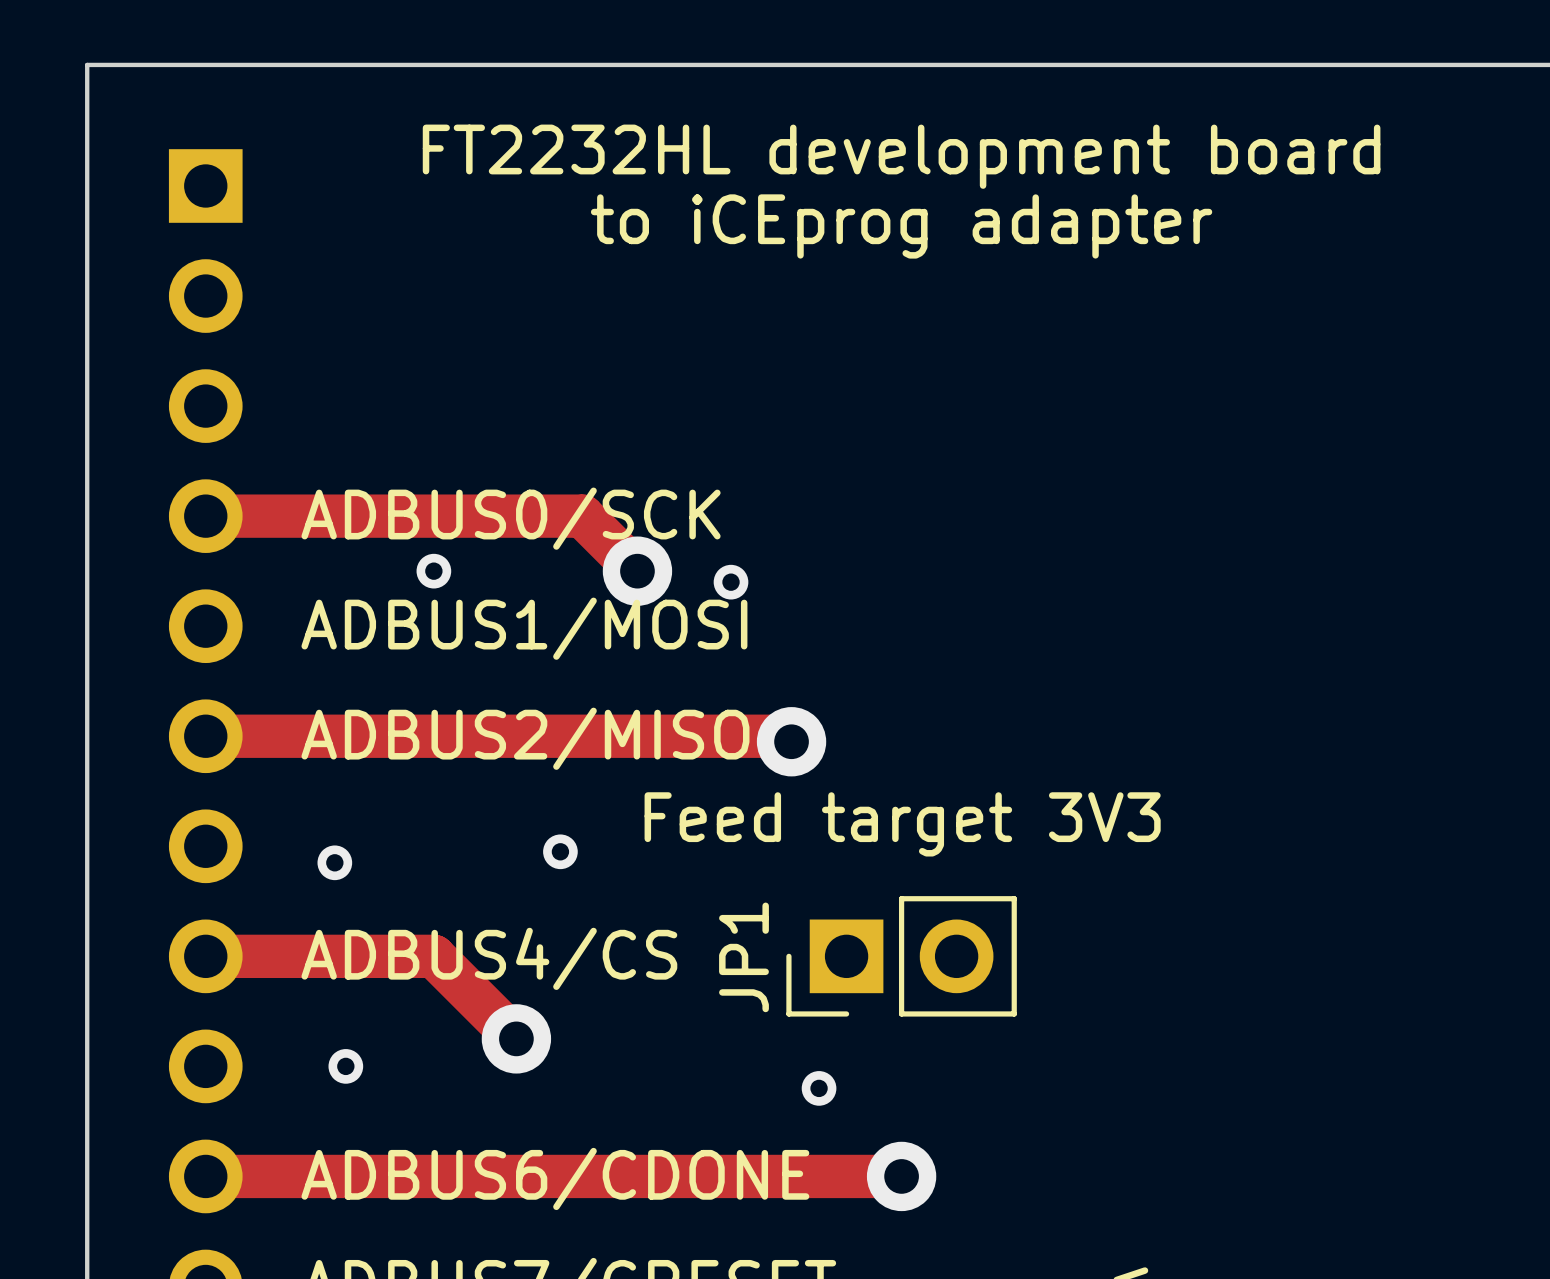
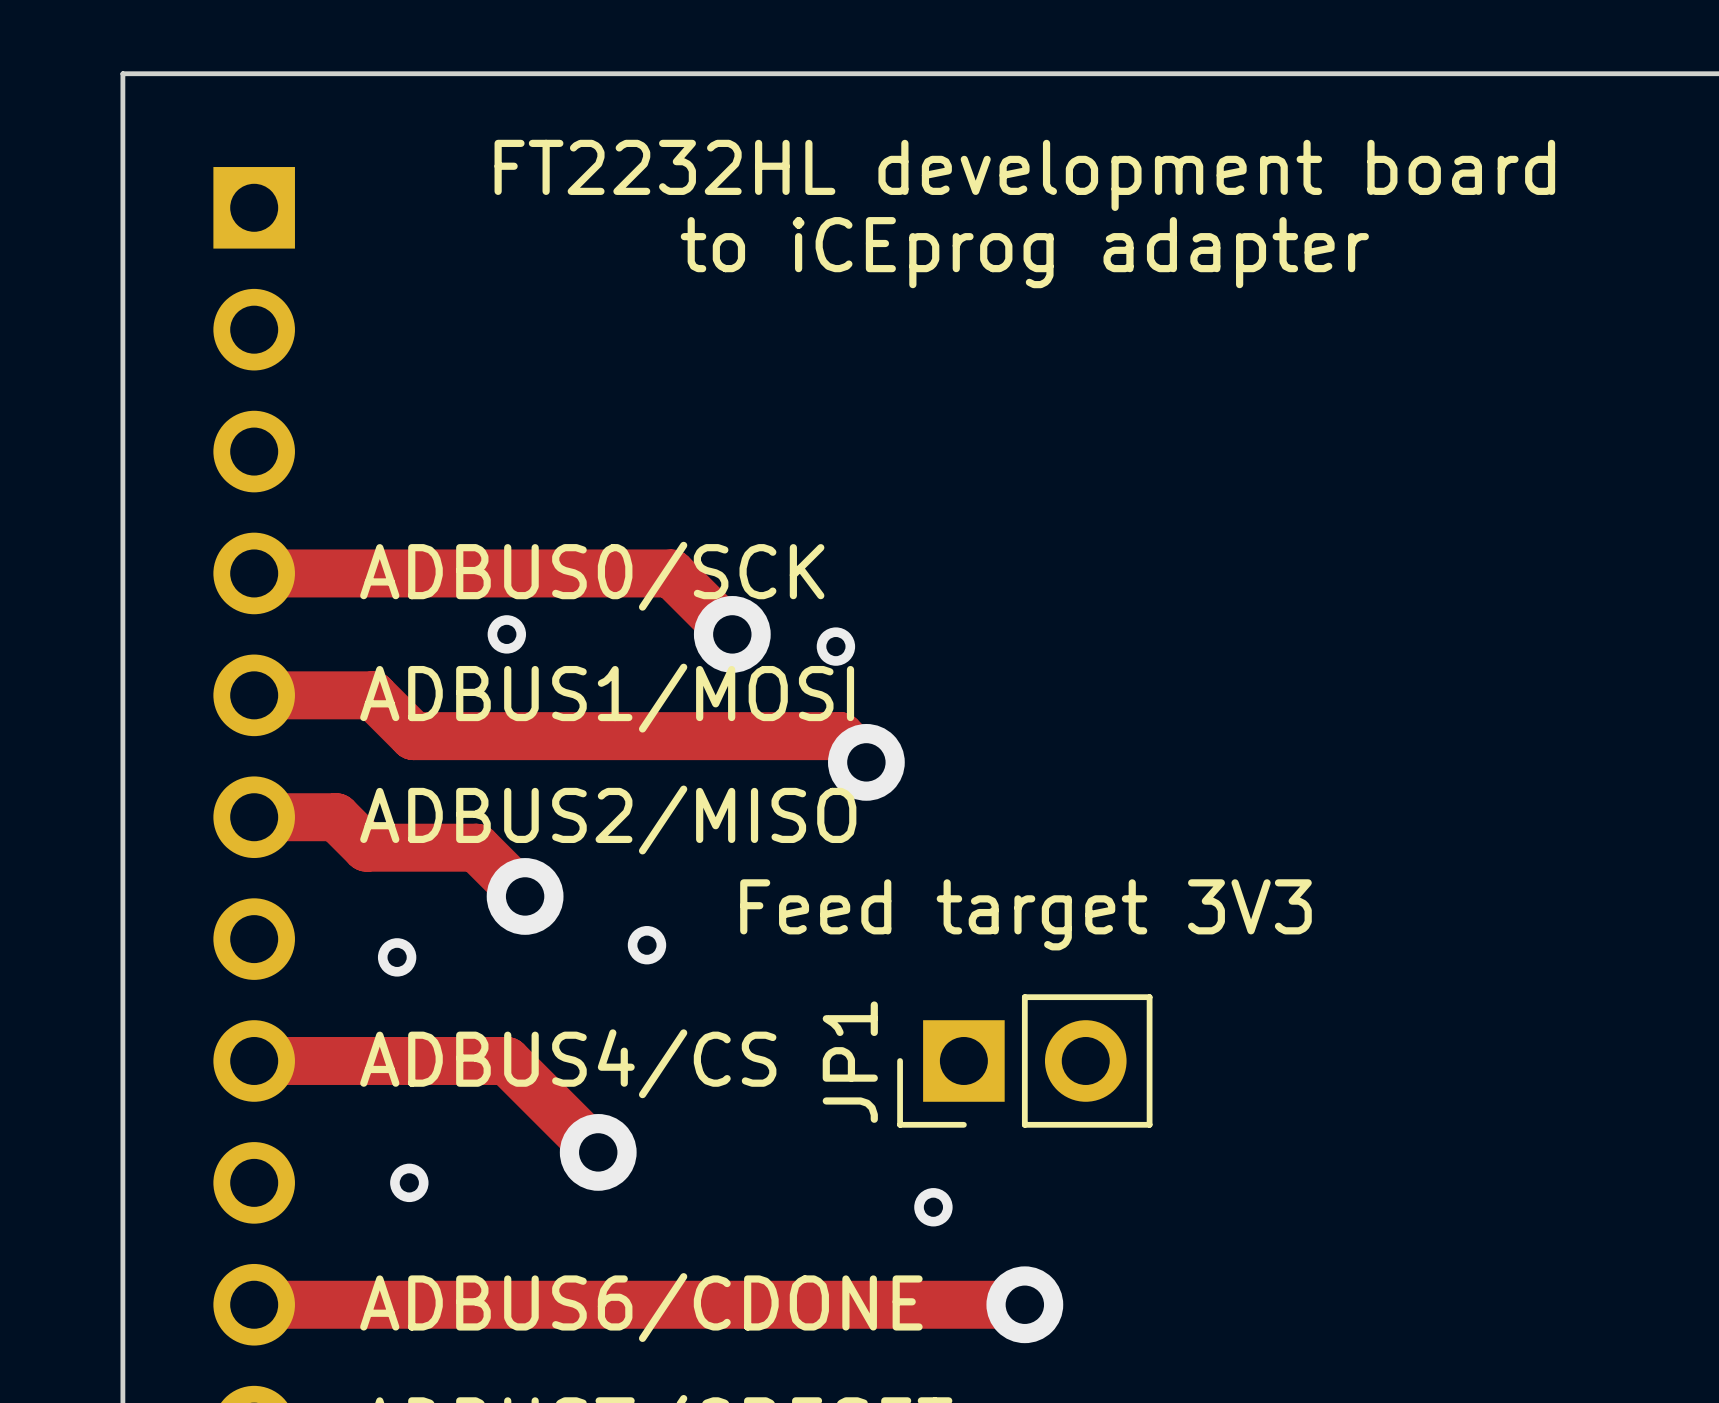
track: none -> (254, 695) (372, 695) (413, 736) (840, 736) (866, 762)
track: (279, 736) (786, 736) (791, 741) -> (336, 817) (366, 847) (476, 847) (525, 896)
via position: (791, 741) -> (866, 762)
via: none -> (525, 896)

